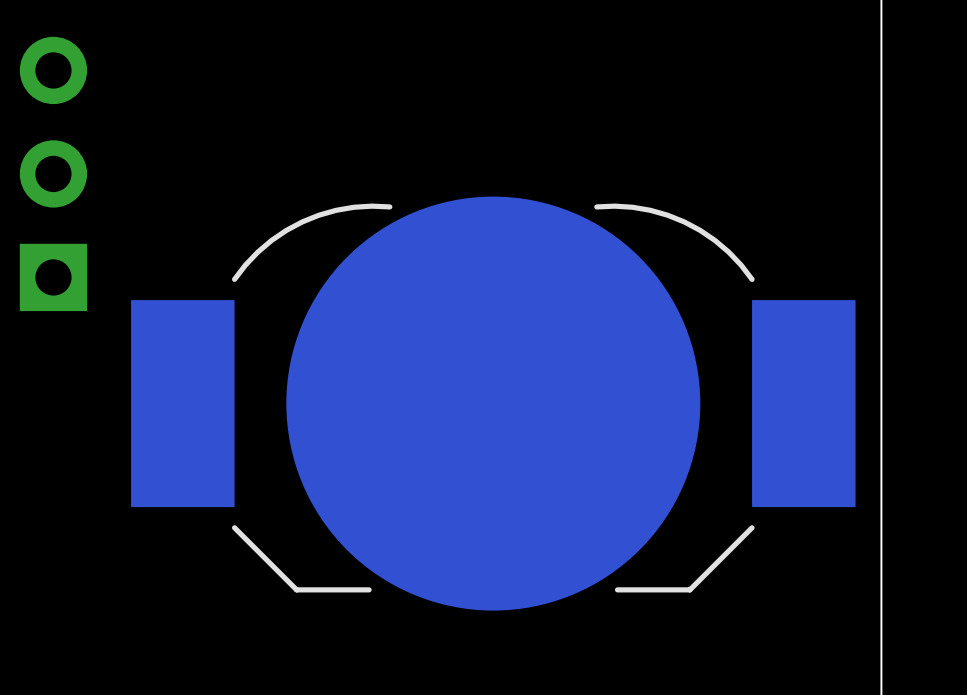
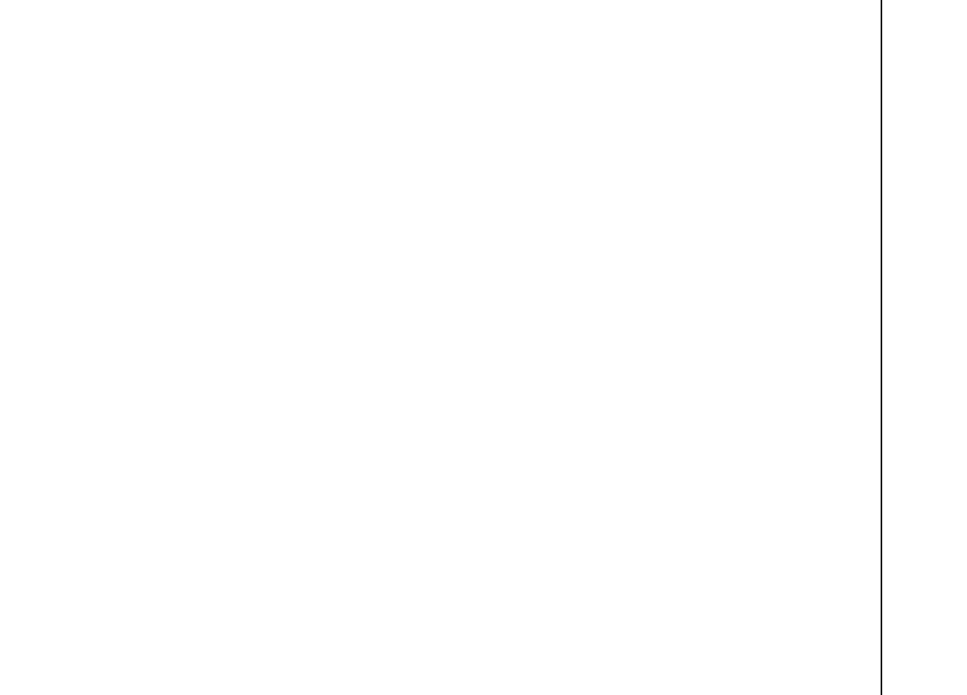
part: (53, 173) -> none
part: (493, 403) -> none

